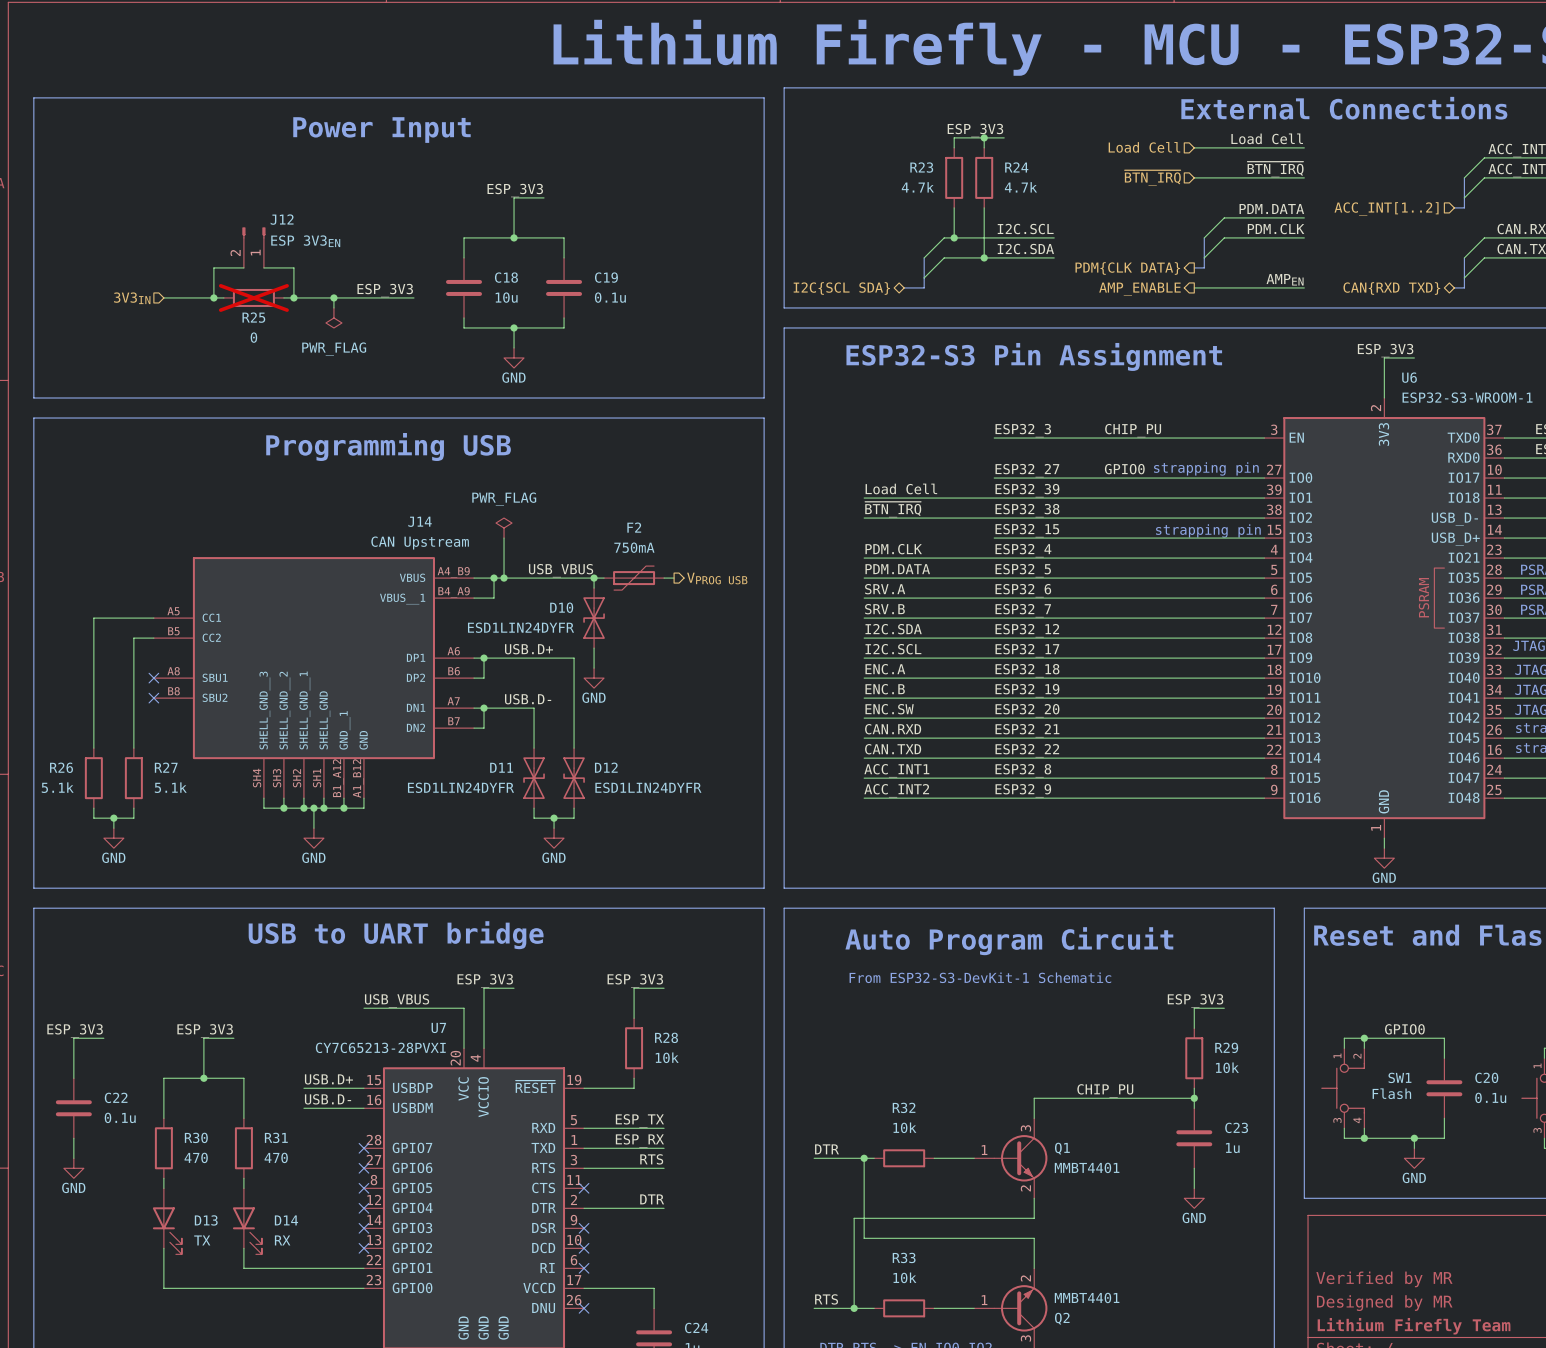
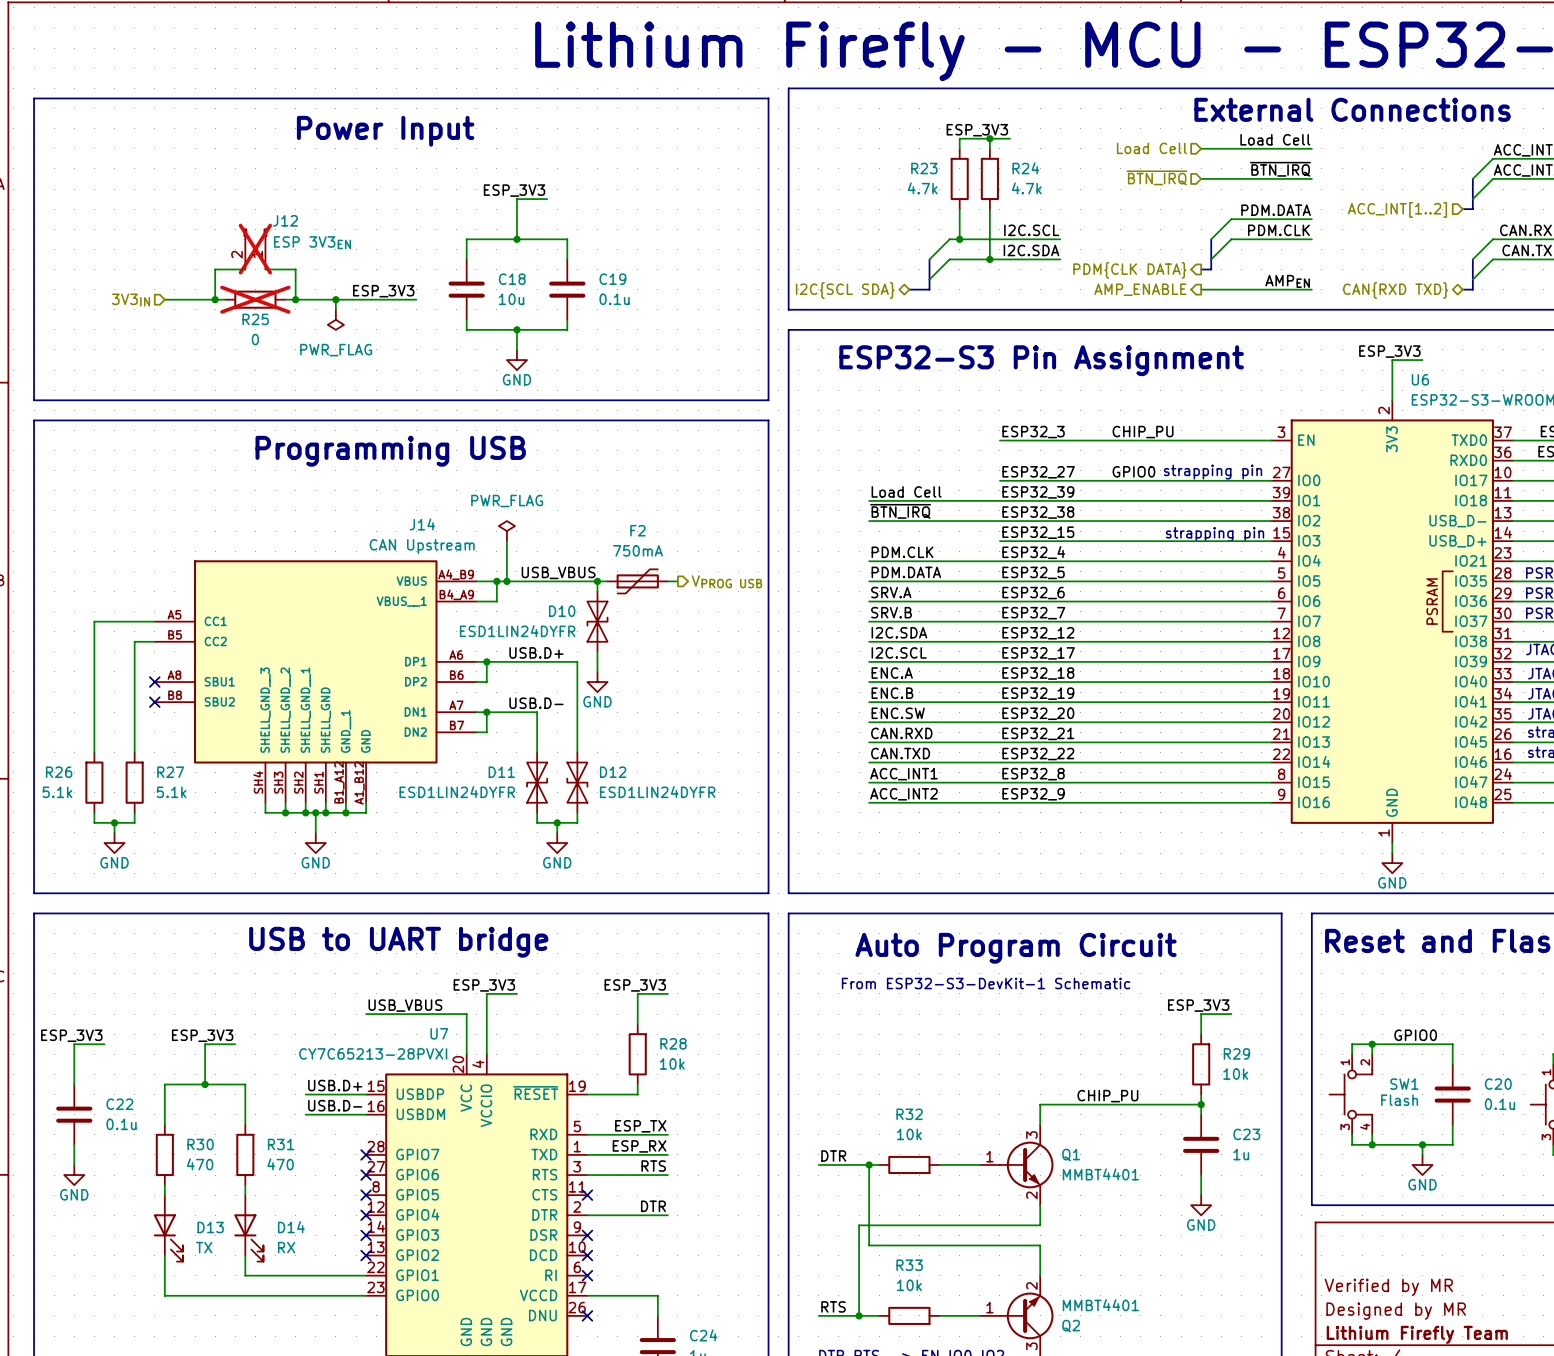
J12 do-not-place cross: none -> (255, 249)

